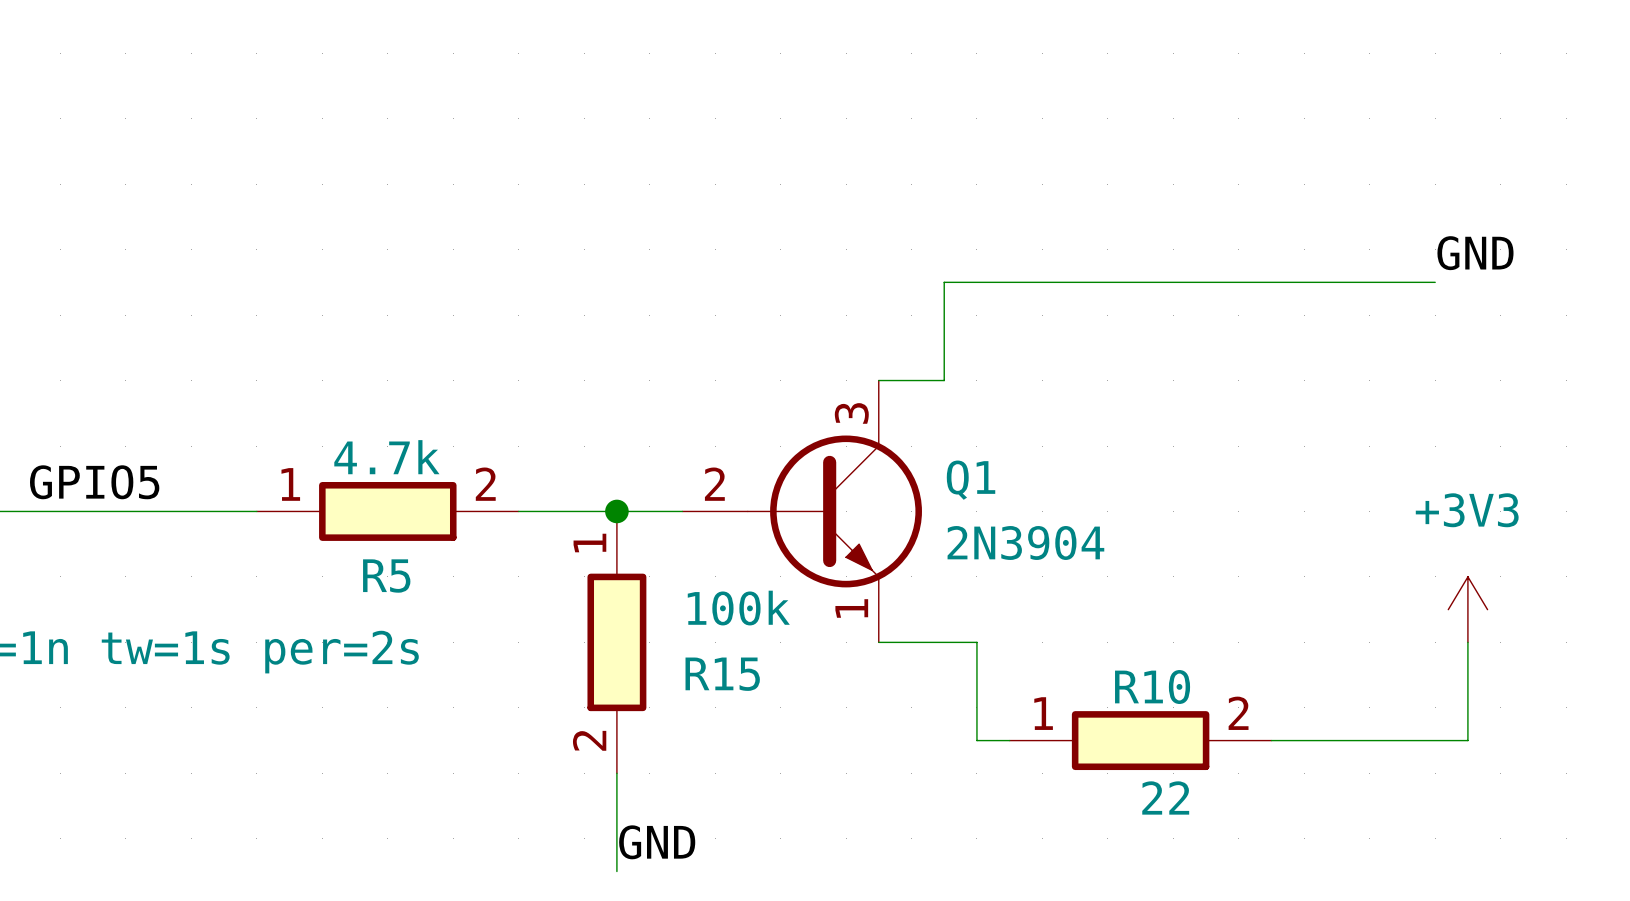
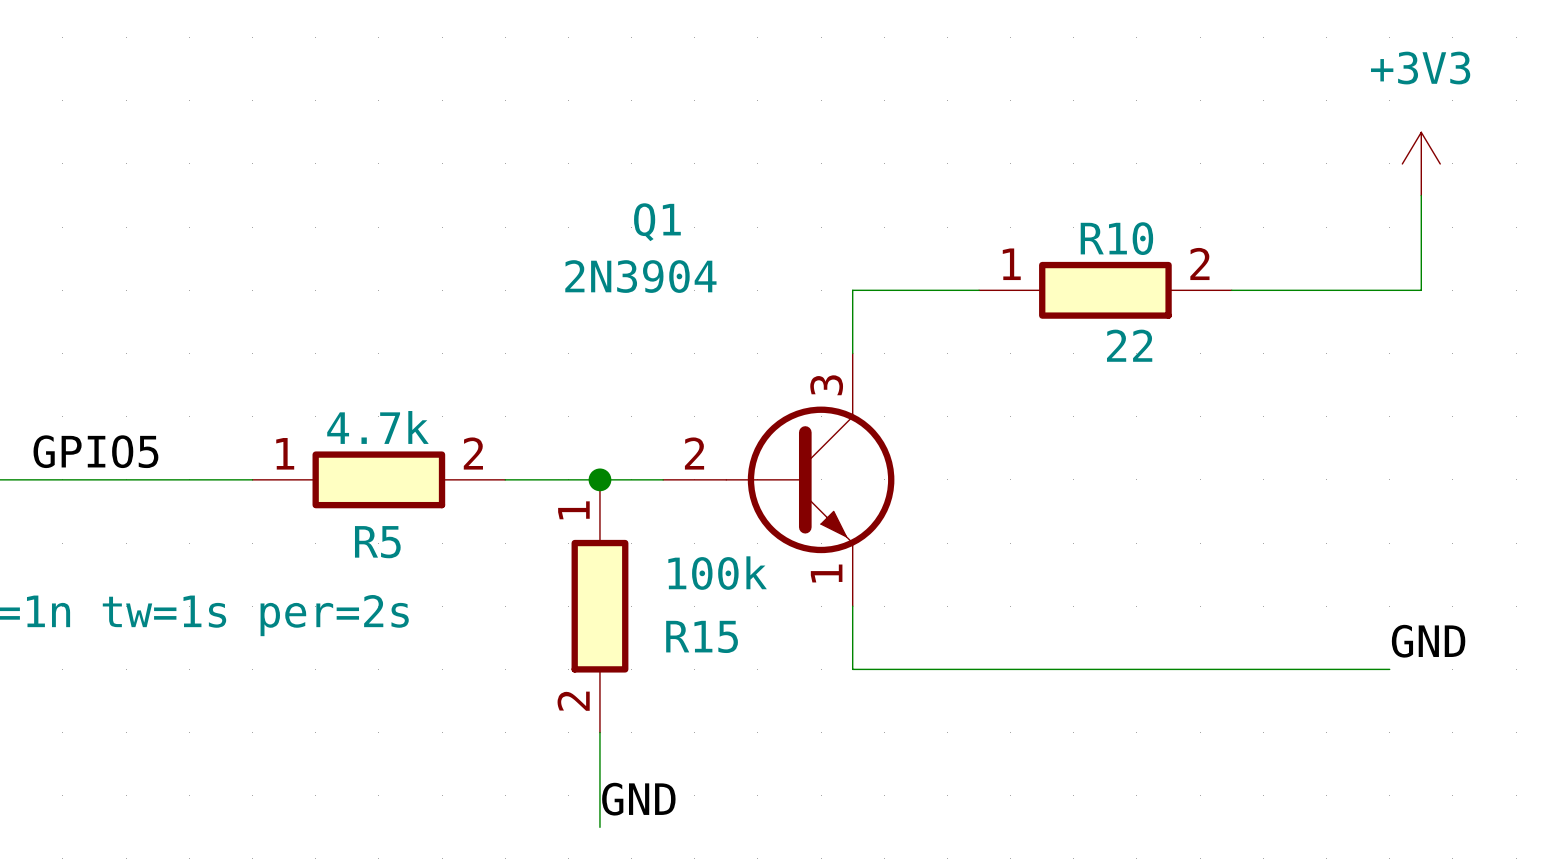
label position: GND (1475, 253) -> GND (1428, 641)
wire: (1435, 282) (944, 282) (944, 380) (878, 380) -> (979, 290) (852, 290) (852, 353)
Q1 name position: Q1 (971, 480) -> Q1 (657, 222)
Q1 value position: 2N3904 (1025, 542) -> 2N3904 (640, 276)
power symbol position: +3V3 (1467, 609) -> +3V3 (1421, 163)
wire: (878, 642) (976, 642) (976, 740) (1009, 740) -> (852, 606) (852, 669) (1389, 669)
wire: (1467, 642) (1467, 740) (1271, 740) -> (1421, 195) (1421, 290) (1231, 290)
R10 position: (1140, 740) -> (1105, 290)

